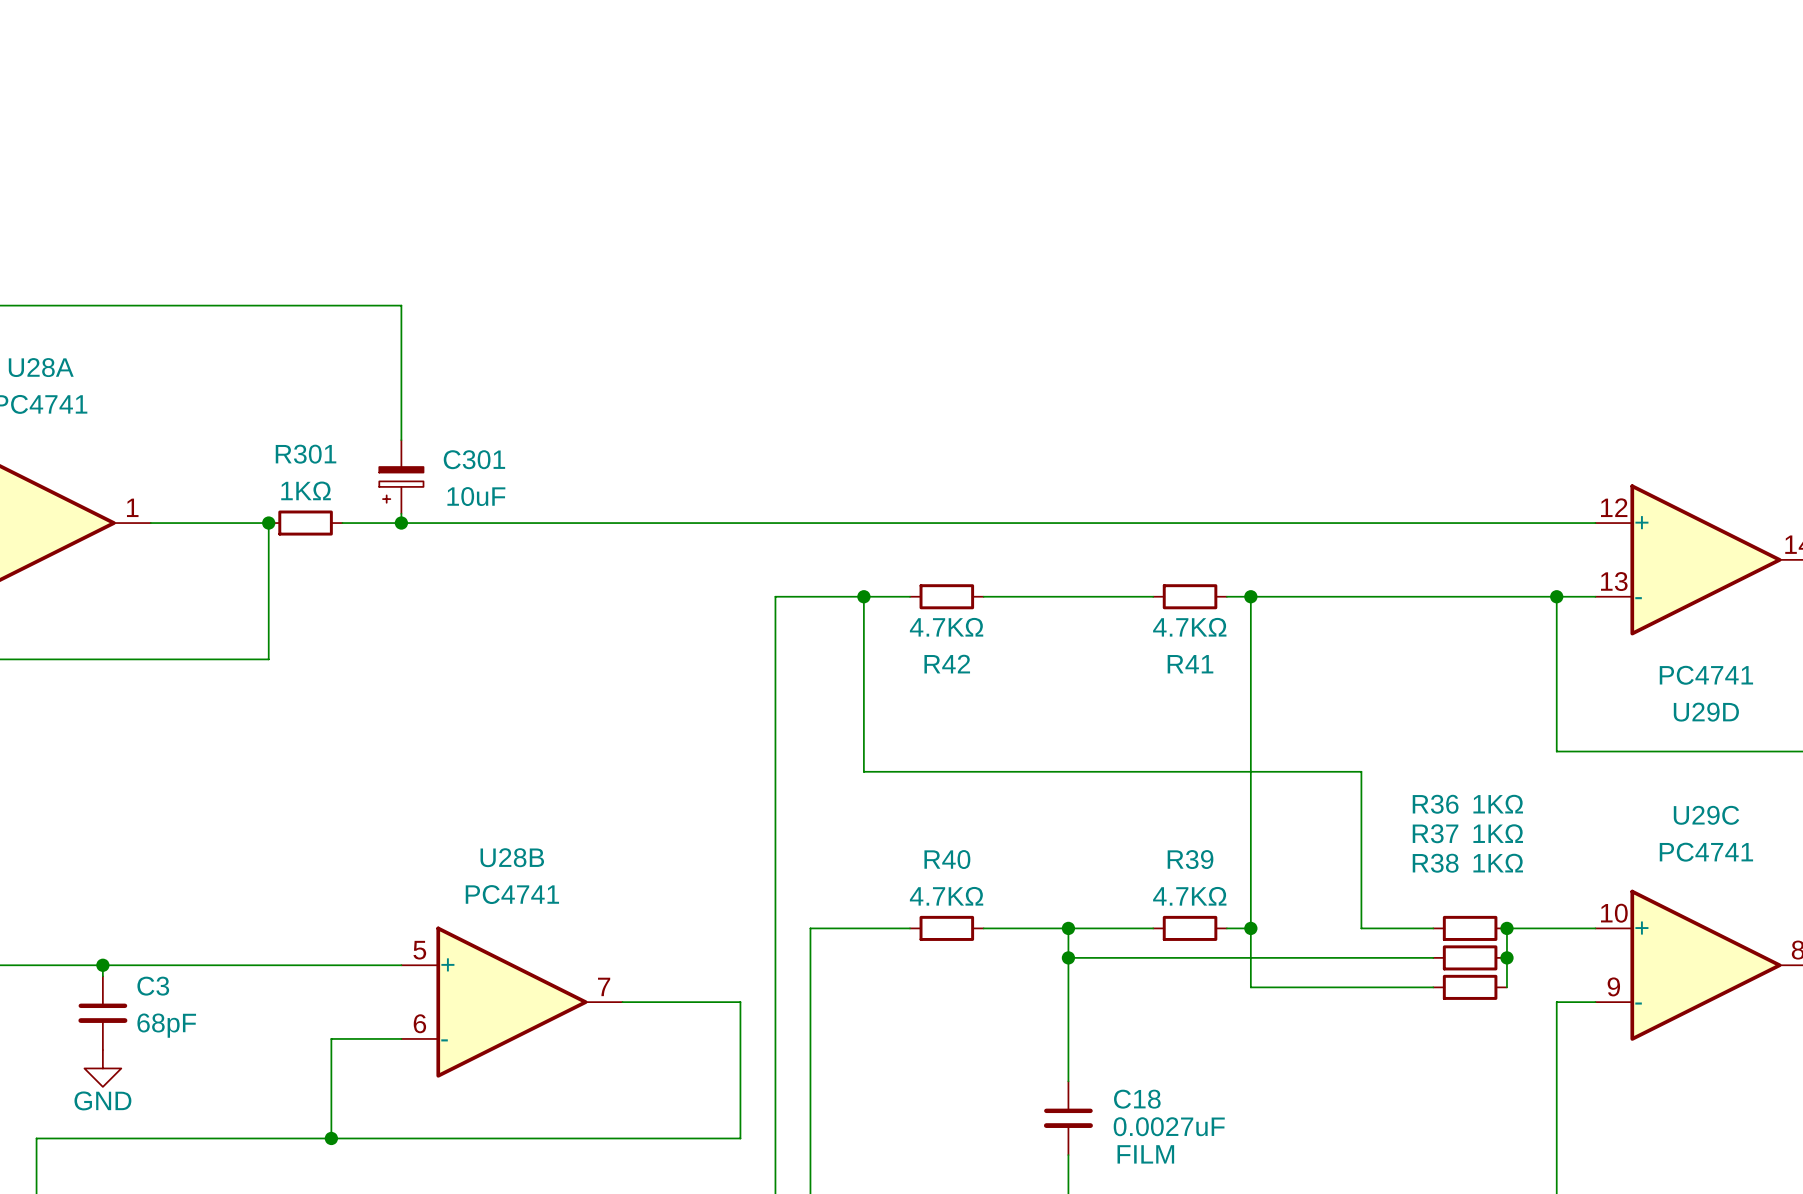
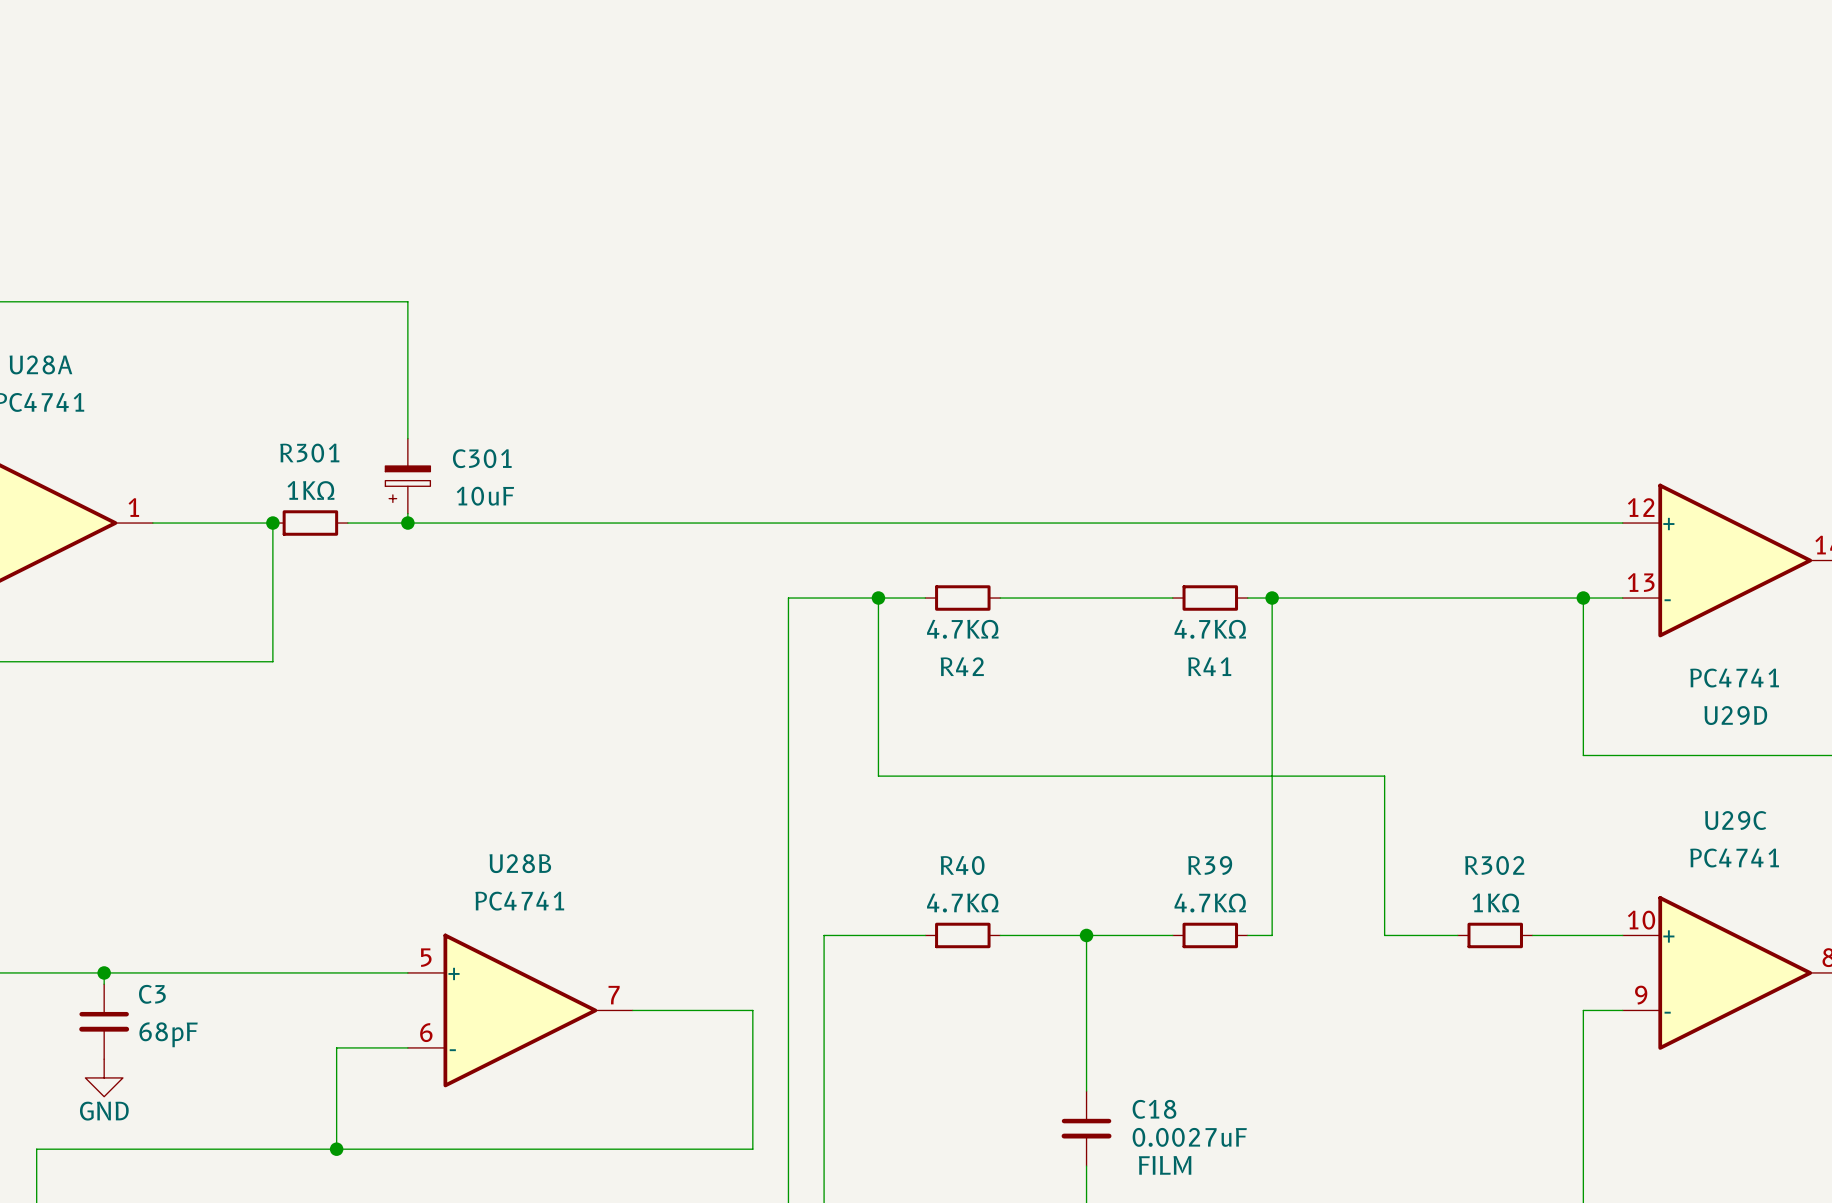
R36 name: R36 (1435, 804) -> R302 (1494, 865)
R36 value position: 1KΩ (1498, 804) -> 1KΩ (1495, 902)
wire: (1250, 928) (1250, 987) (1433, 987) -> none
junction: (1250, 928) -> none
wire: (1506, 928) (1506, 987) -> none
junction: (1506, 928) -> none
wire: (1068, 957) (1433, 957) -> none
junction: (1068, 957) -> none
R37: 1KΩ (1470, 957) -> none
junction: (1506, 957) -> none
R38: 1KΩ (1470, 987) -> none

